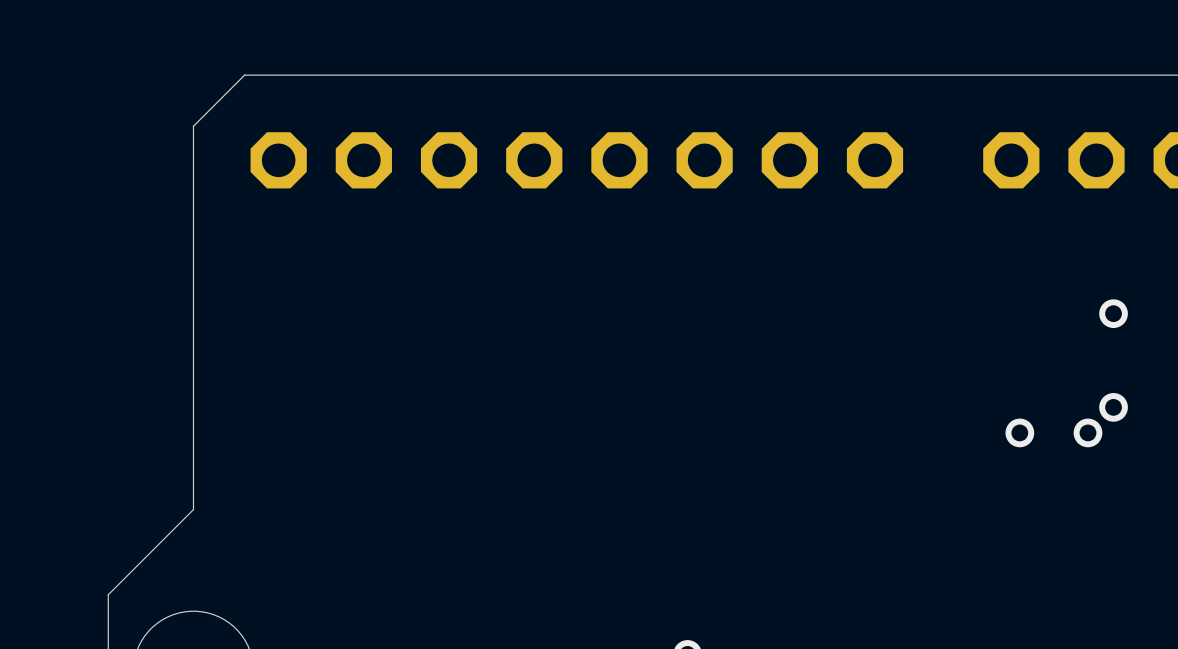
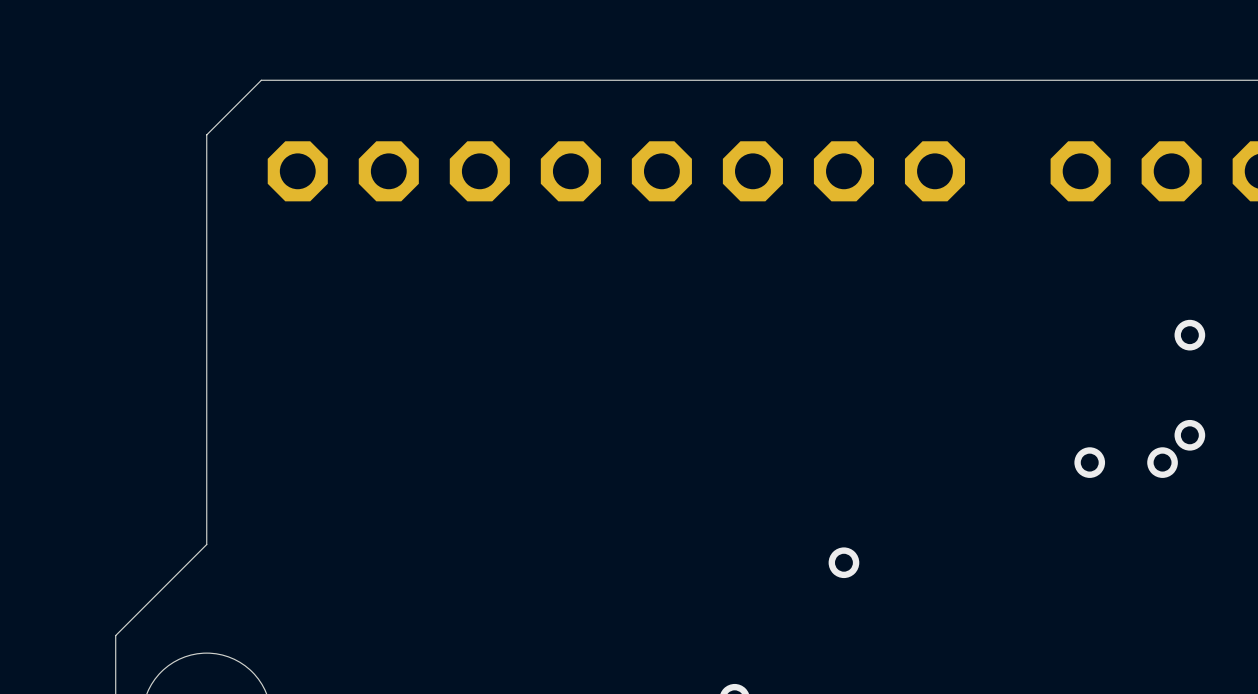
via: none -> (843, 562)

